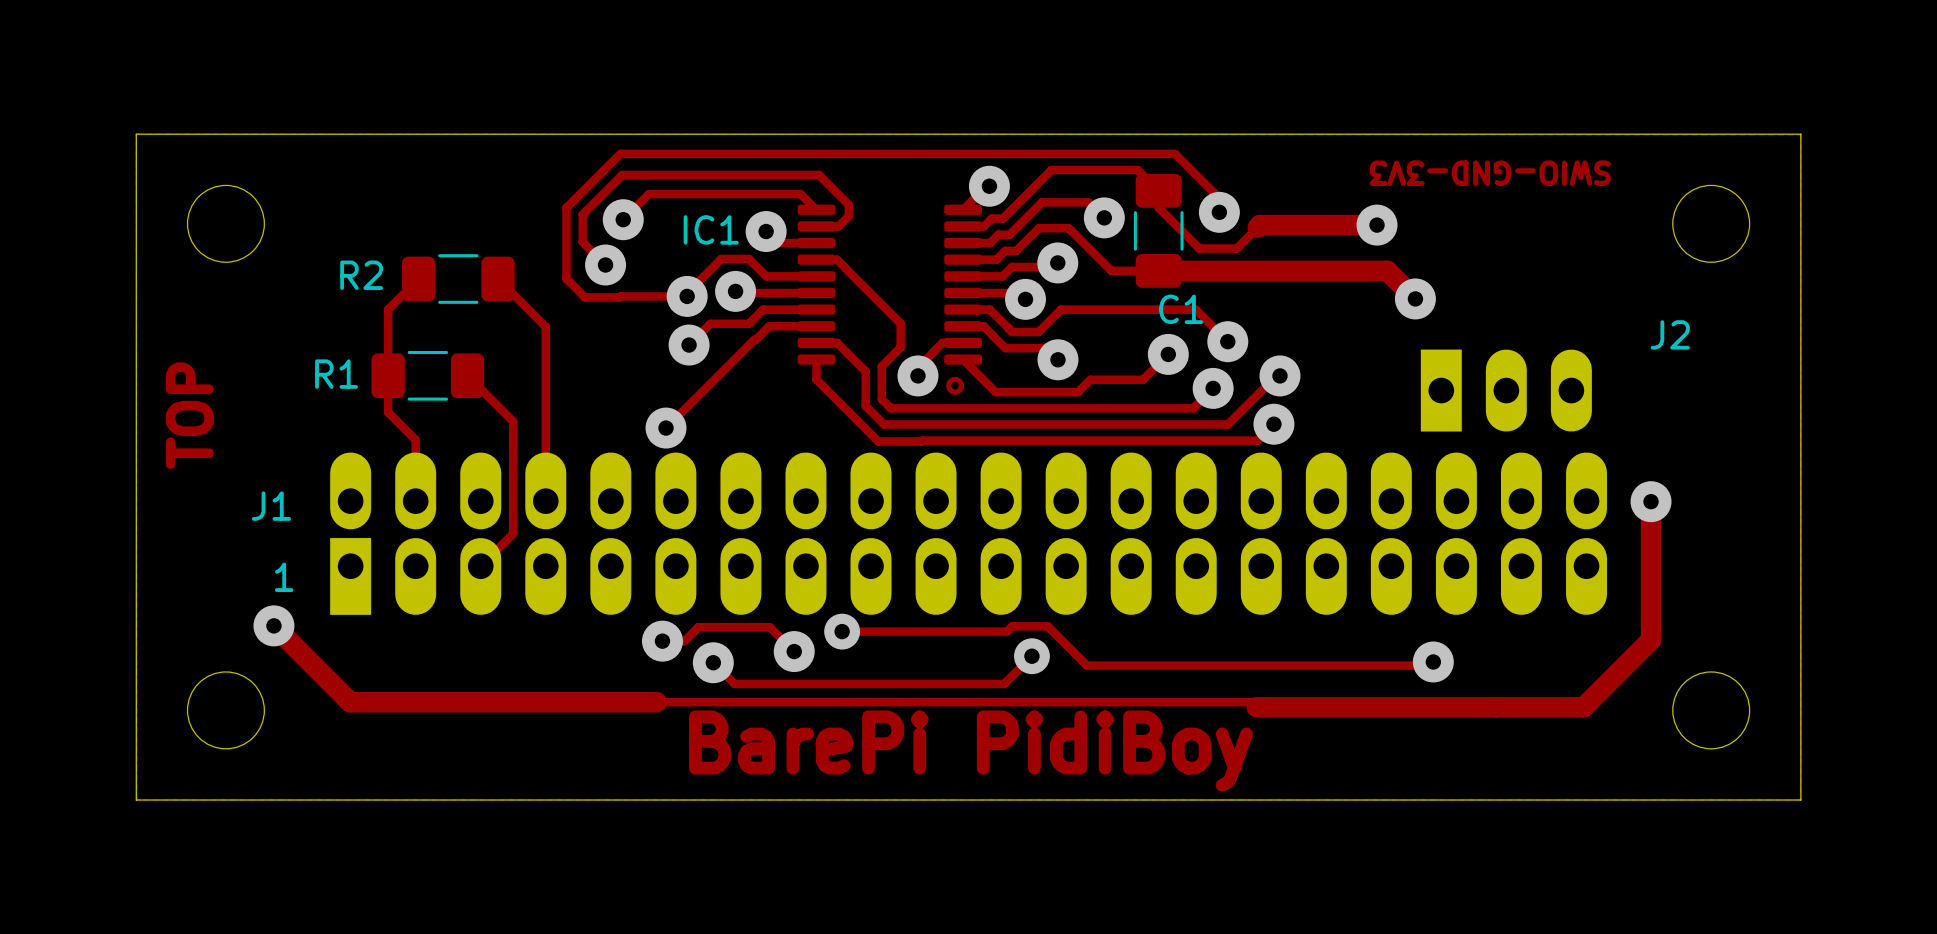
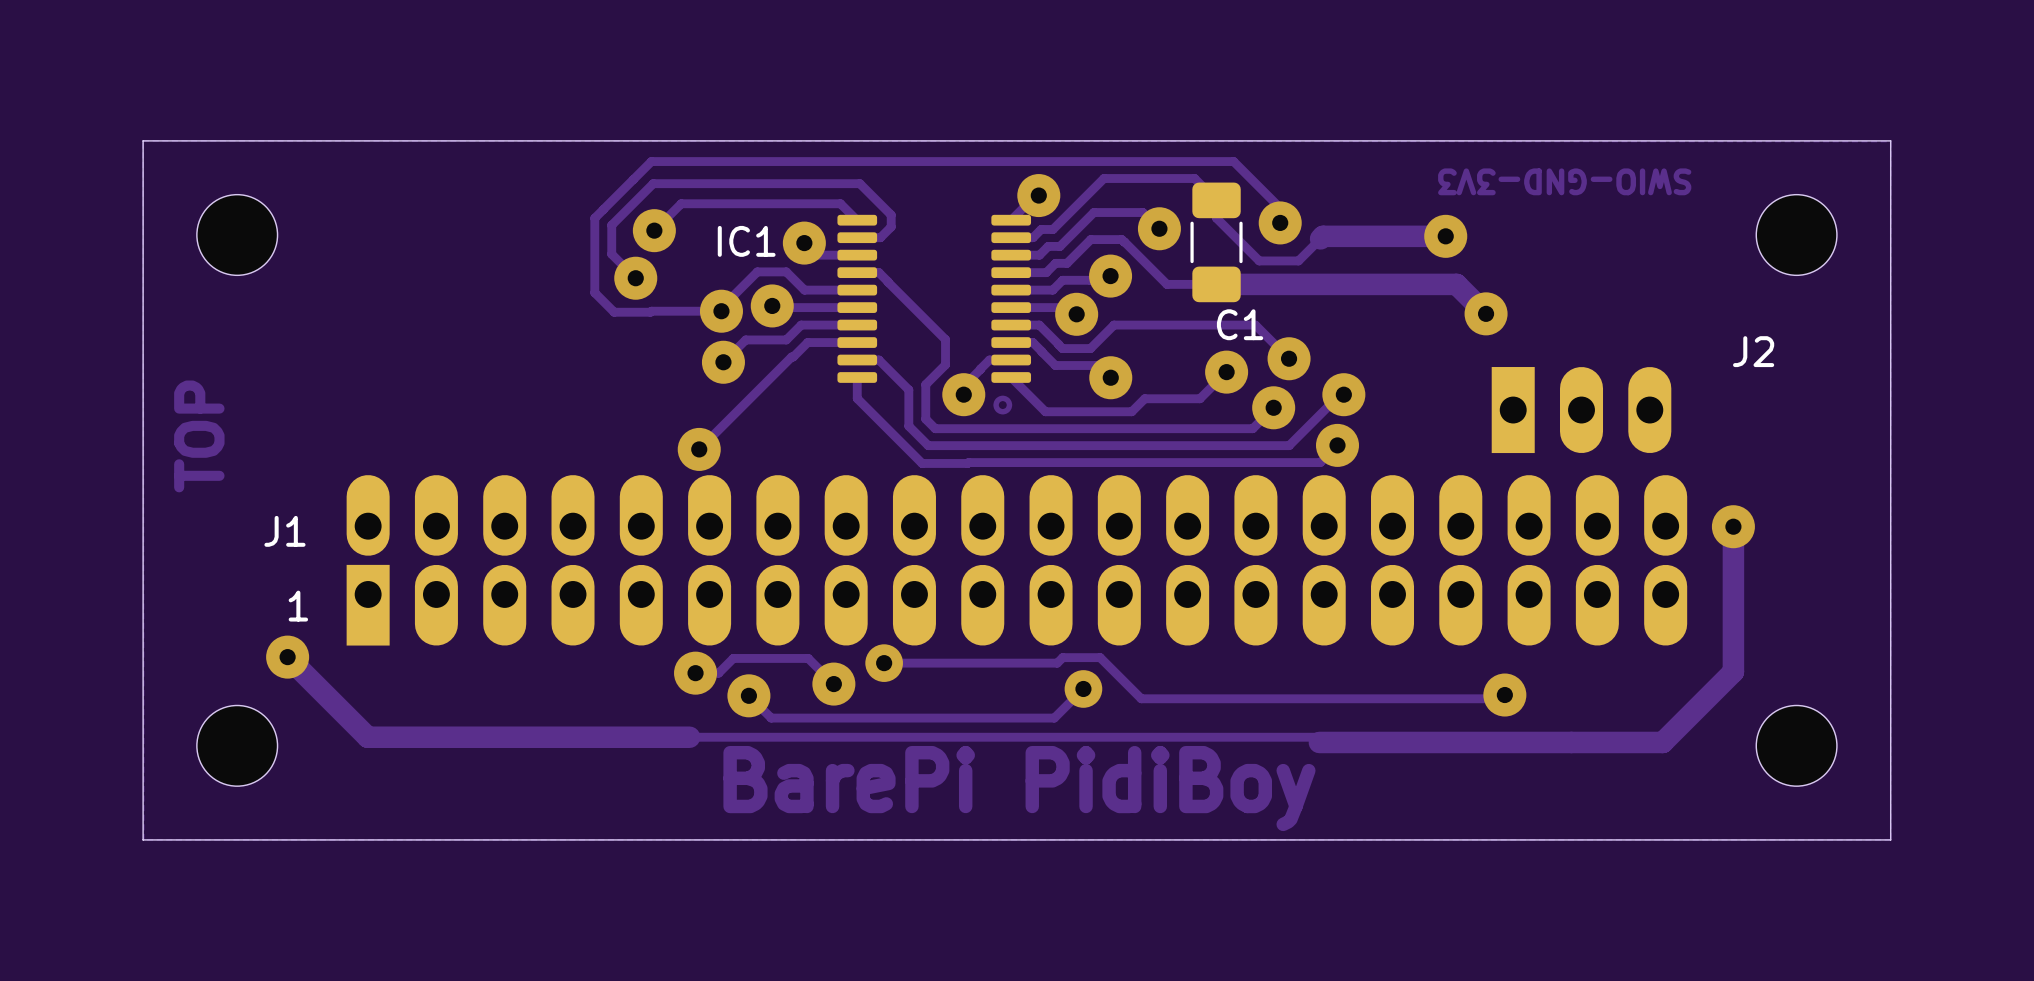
track: (418, 279) (388, 309) (388, 412) (415, 439) (415, 501) -> none
R2: (458, 279) -> none
track: (498, 279) (545, 326) (545, 501) -> none
R1: (427, 375) -> none
track: (467, 375) (513, 421) (513, 533) (480, 566) -> none

